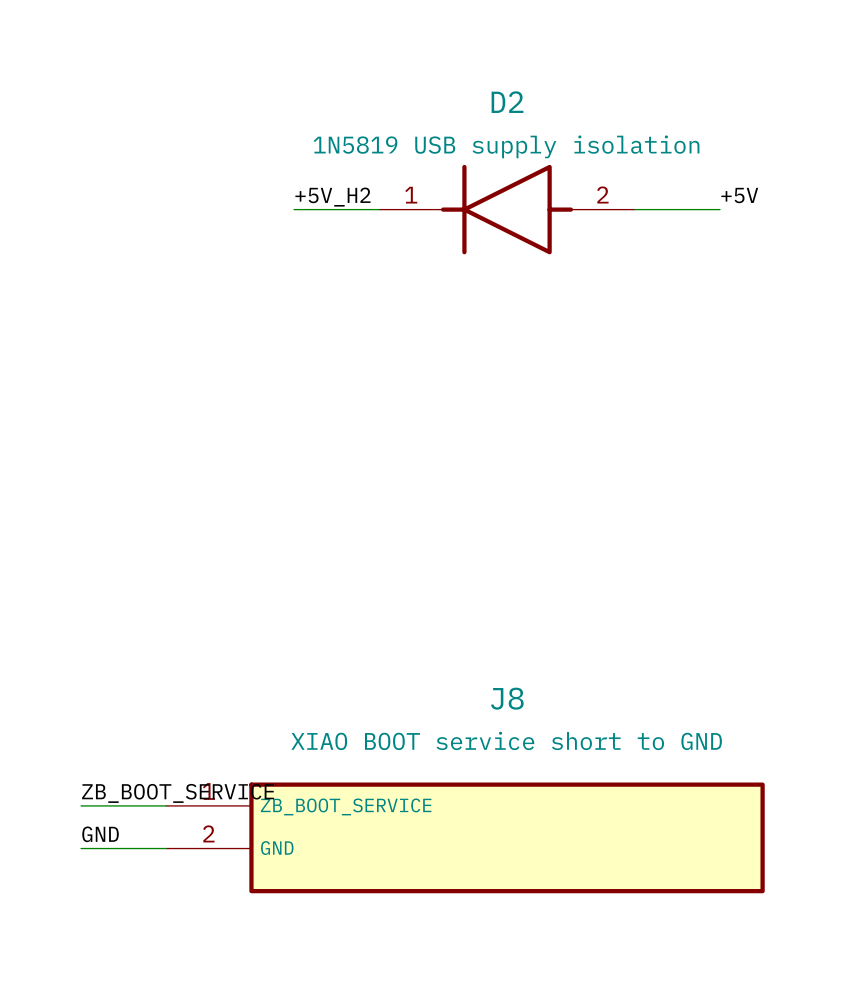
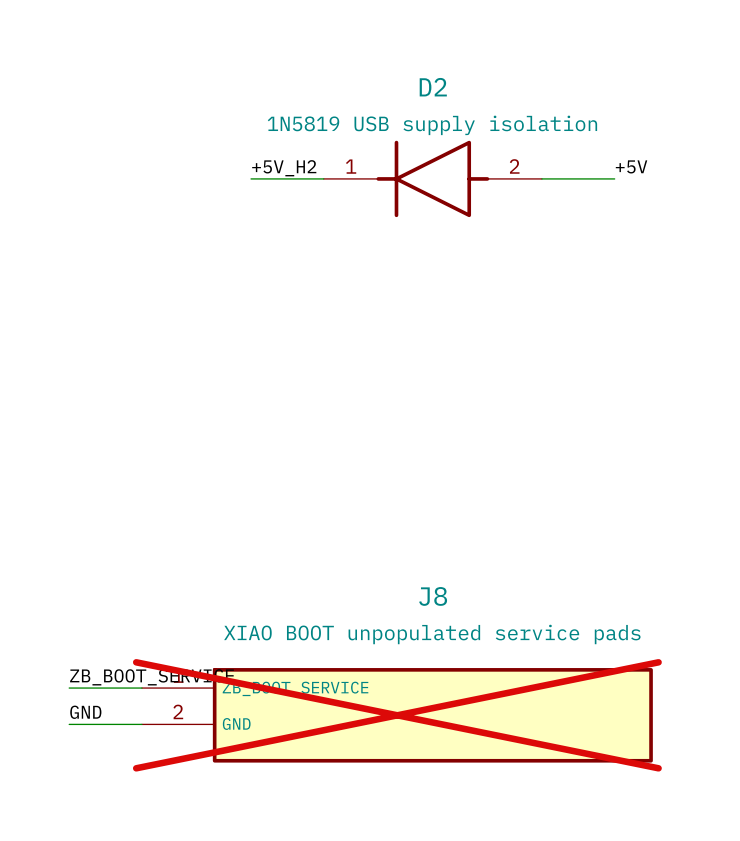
J8 value: XIAO BOOT service short to GND (506, 740) -> XIAO BOOT unpopulated service pads (432, 634)
J8 do-not-place cross: none -> (397, 715)

